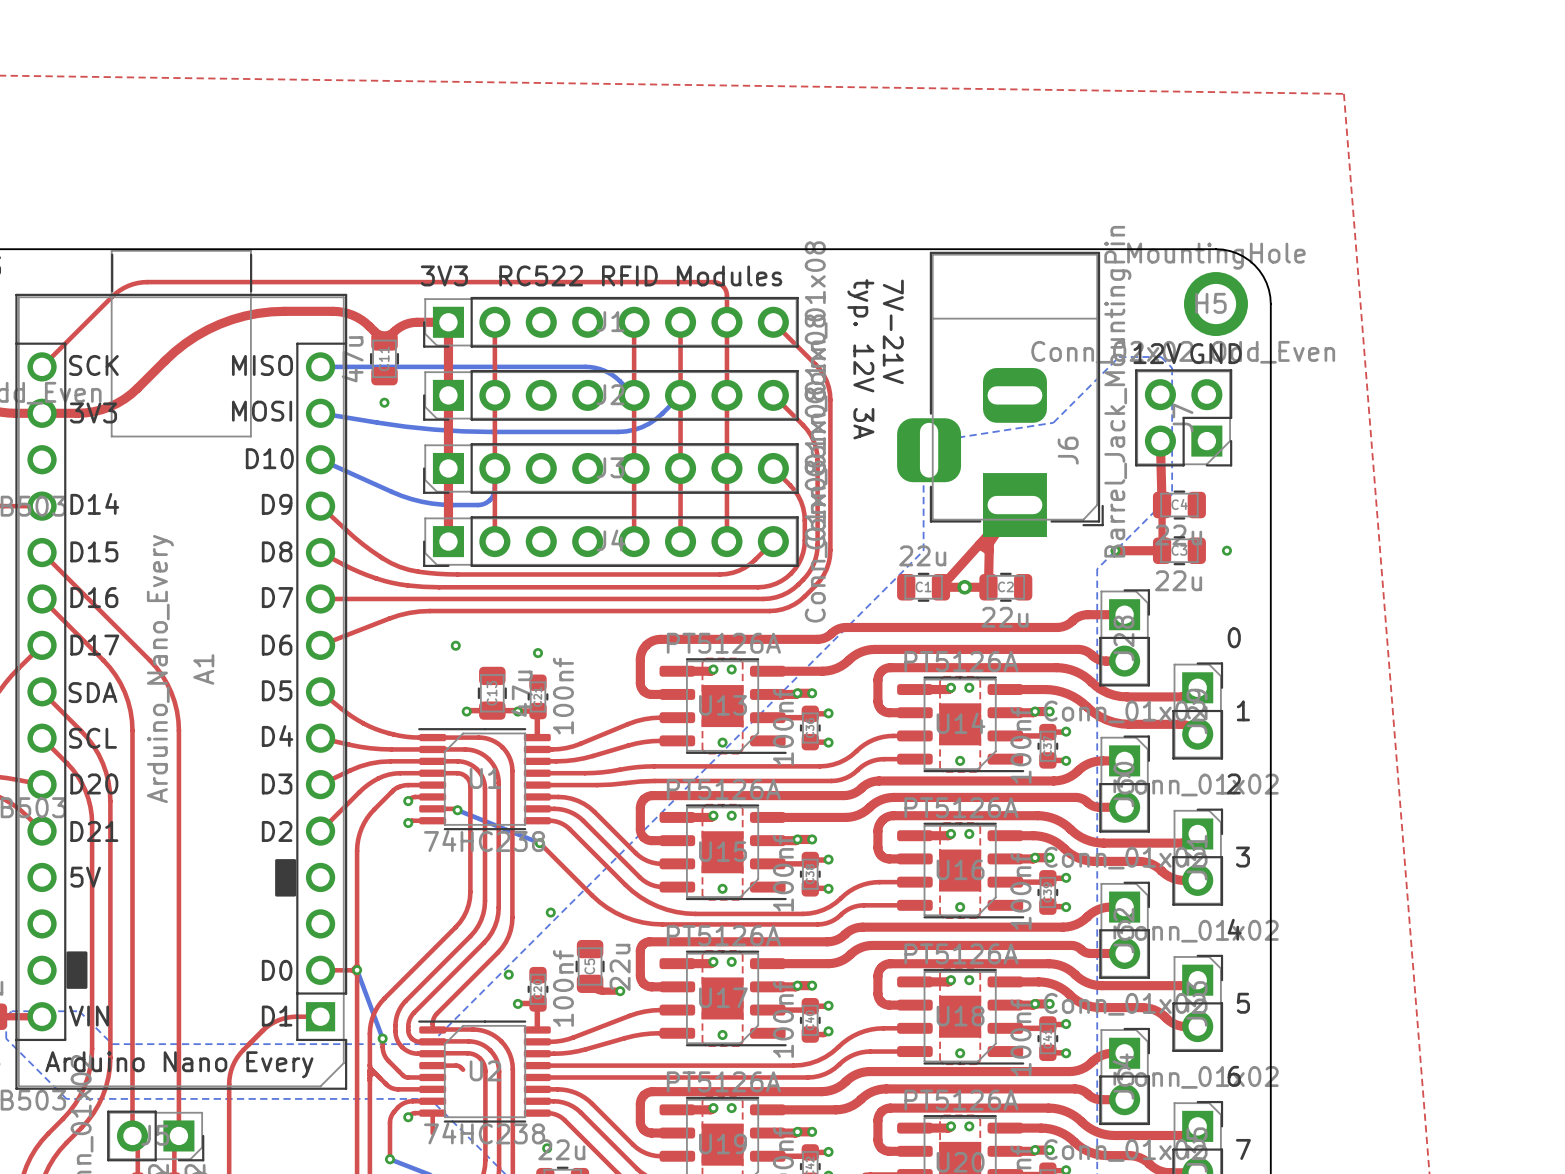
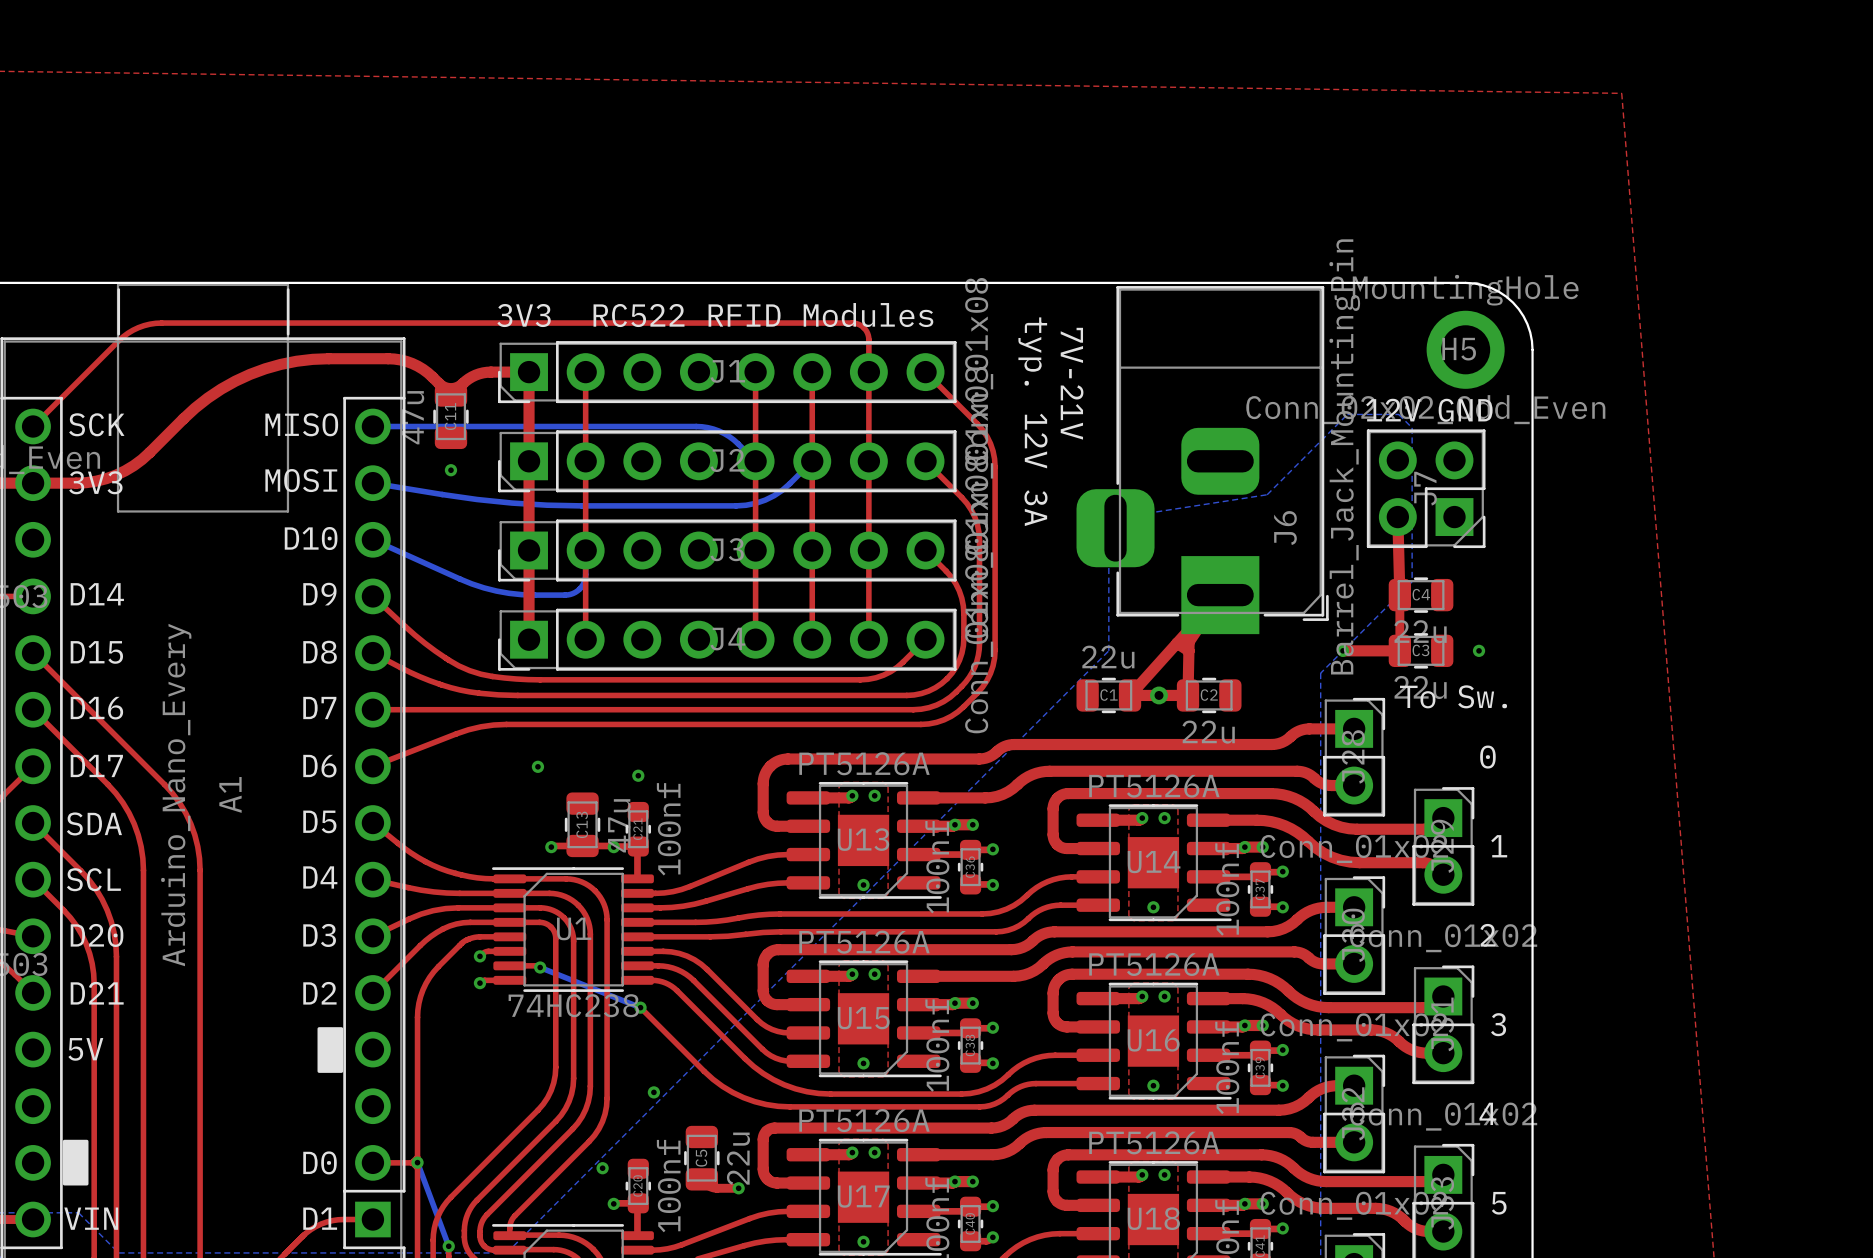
text: none -> To Sw. (1453, 696)

